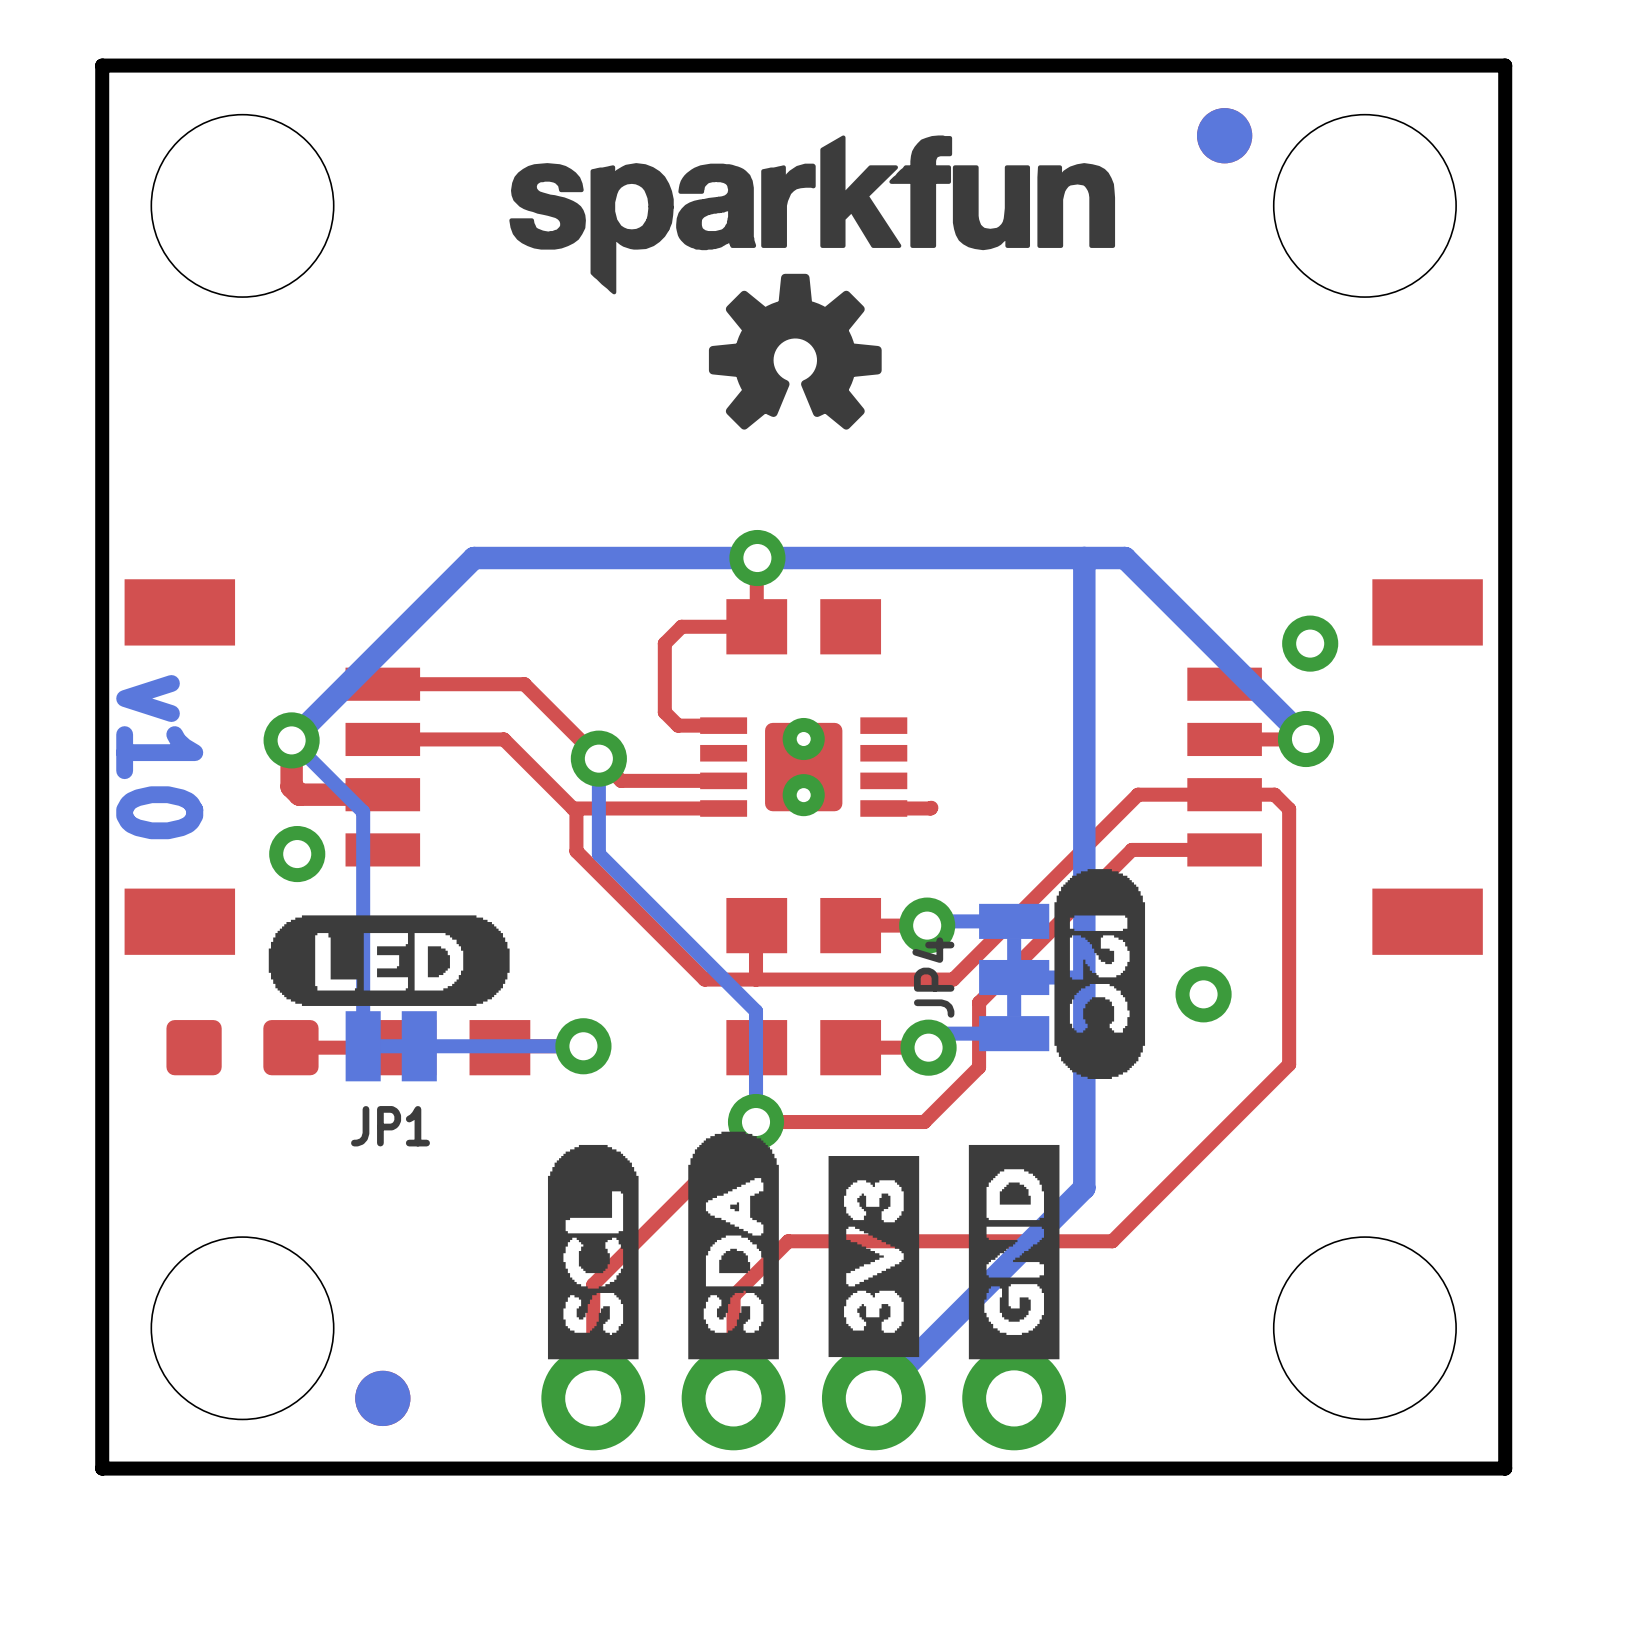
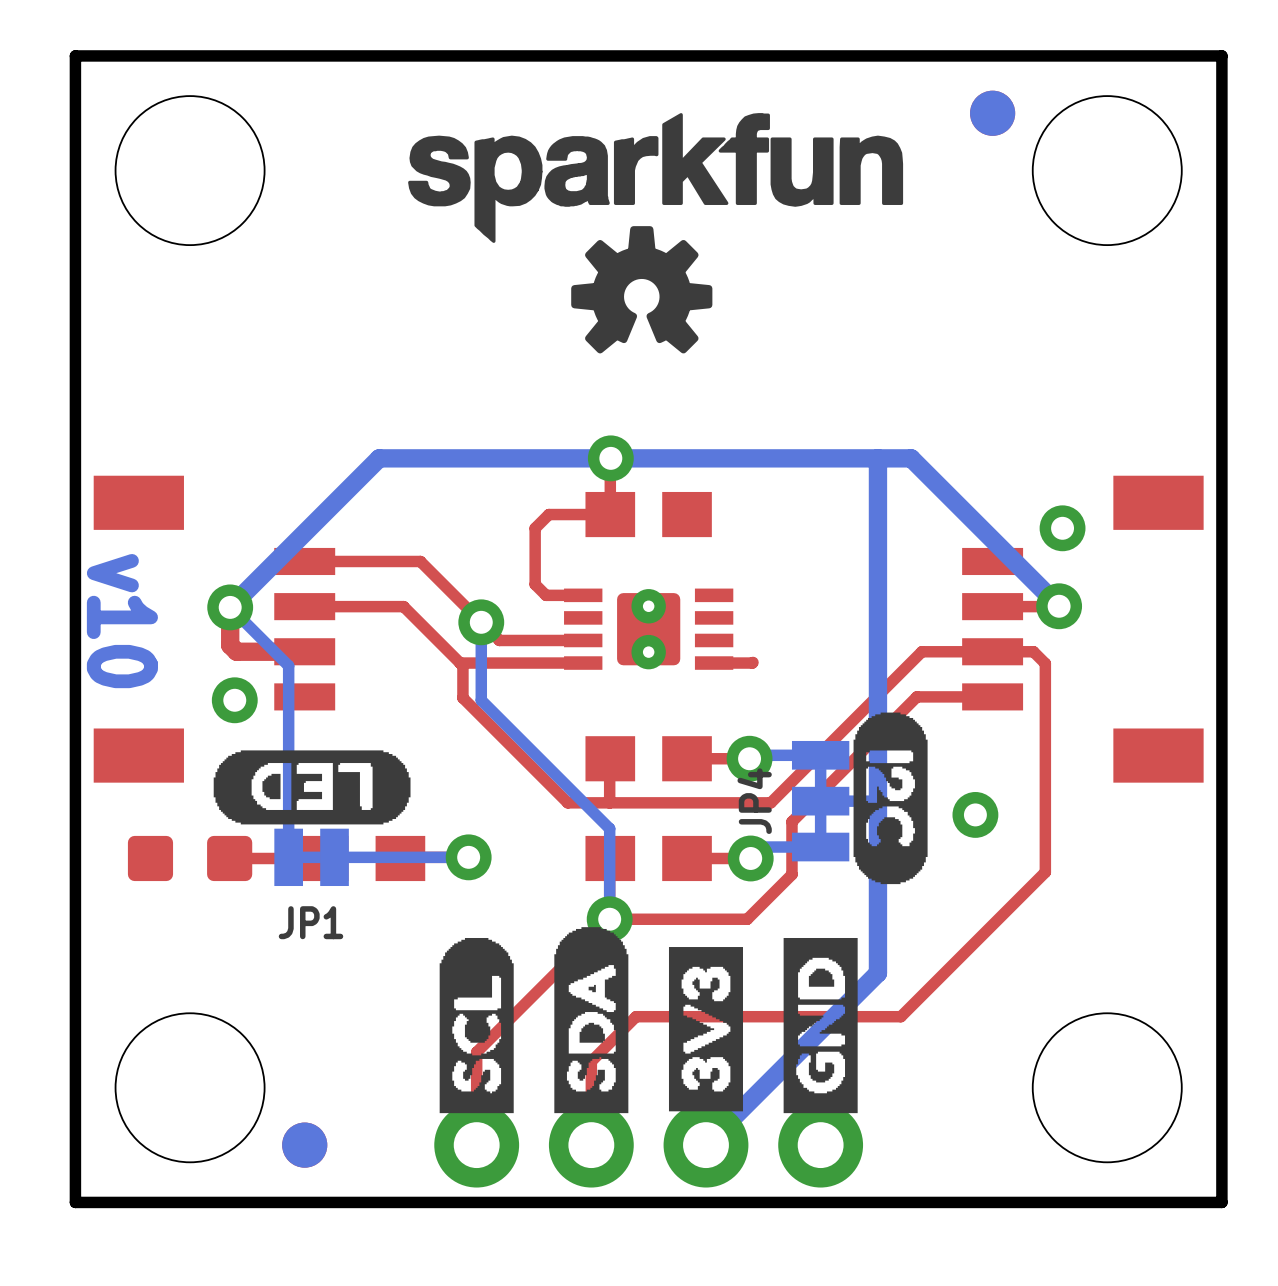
drawing shape: [268, 915, 510, 1006] -> [213, 750, 411, 825]

